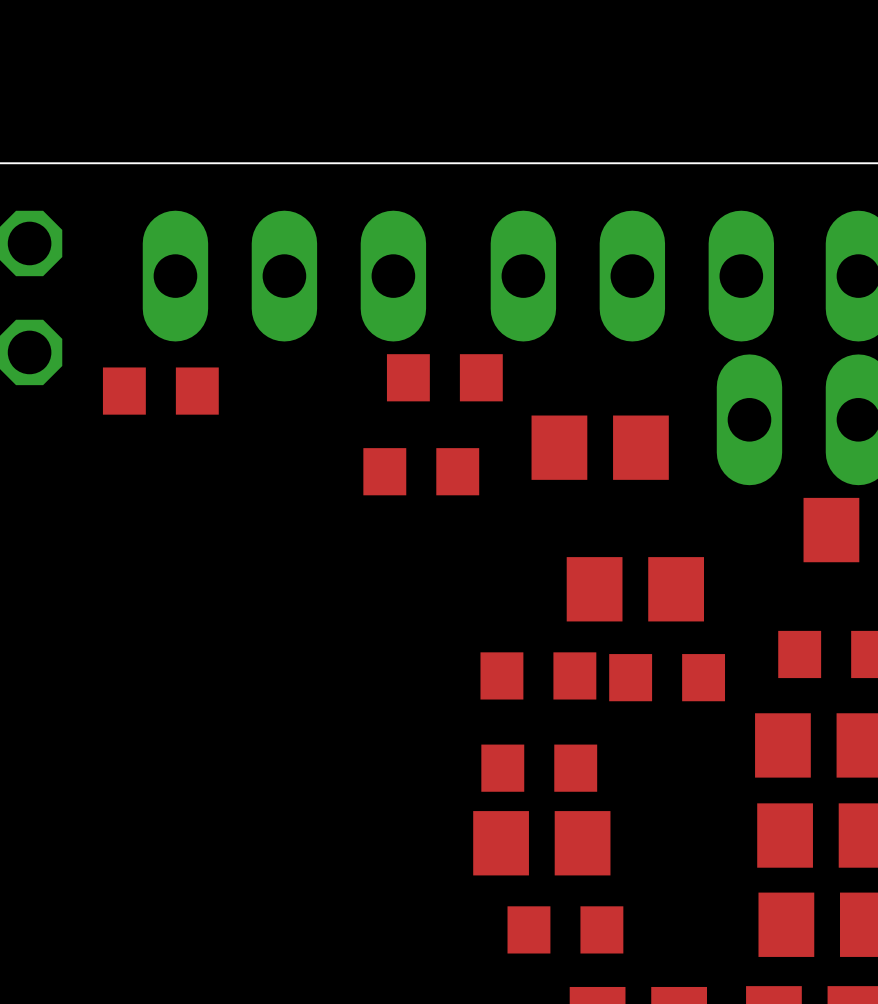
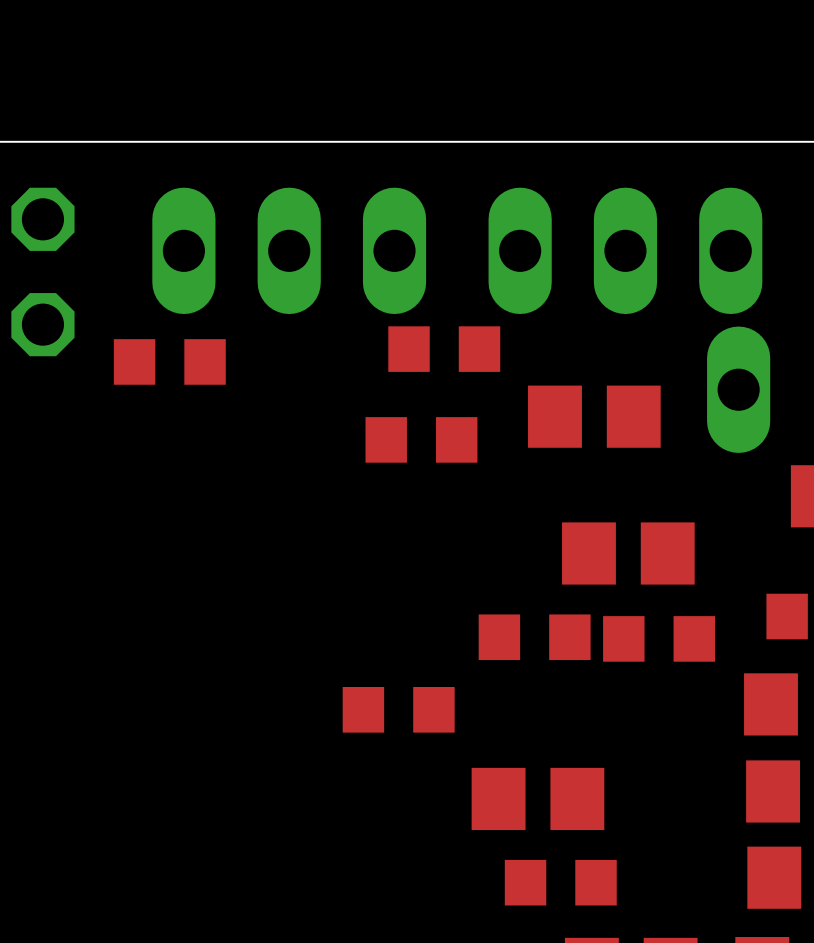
part position: (539, 768) -> (398, 709)

